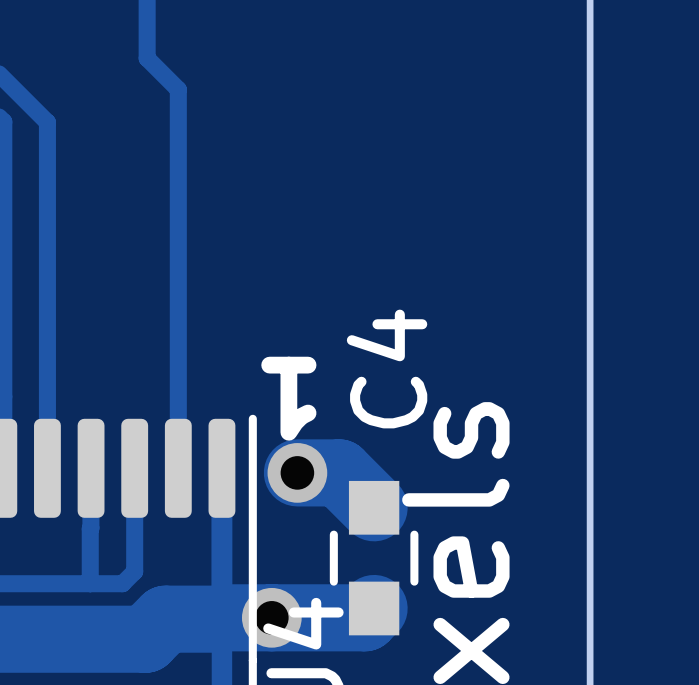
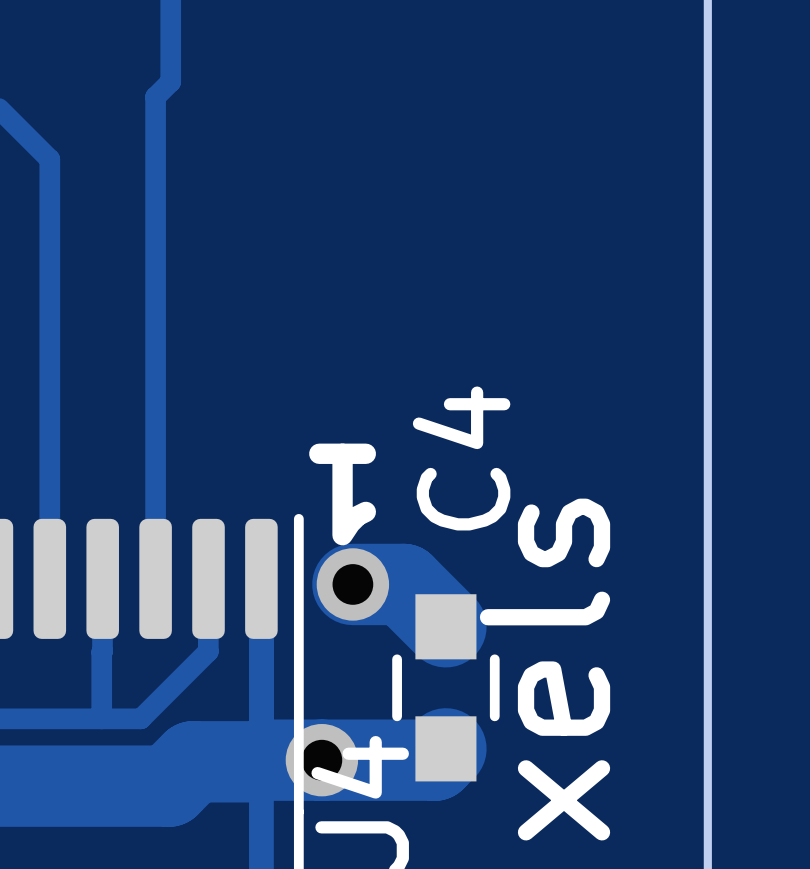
track: (147, 58) (178, 89) (178, 468) -> (170, 81) (155, 96) (155, 571)
track: (134, 468) (134, 571) -> (208, 571) (208, 651) (155, 704)

